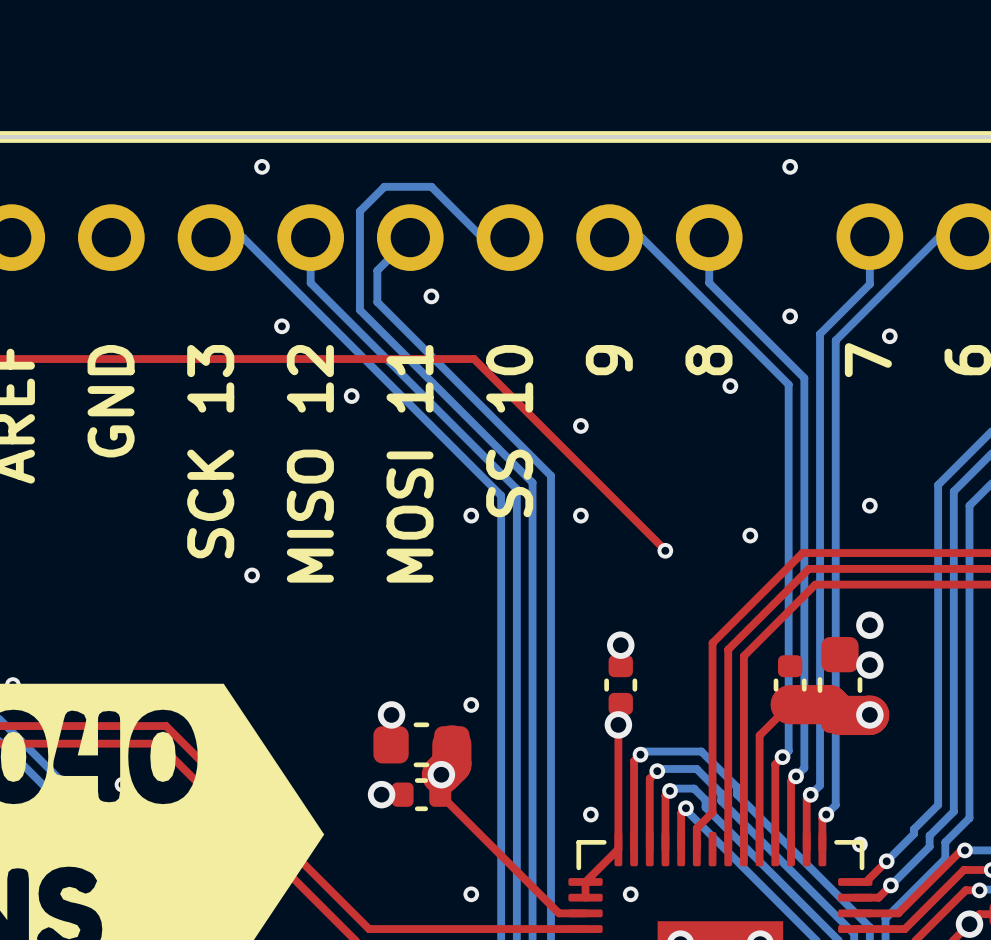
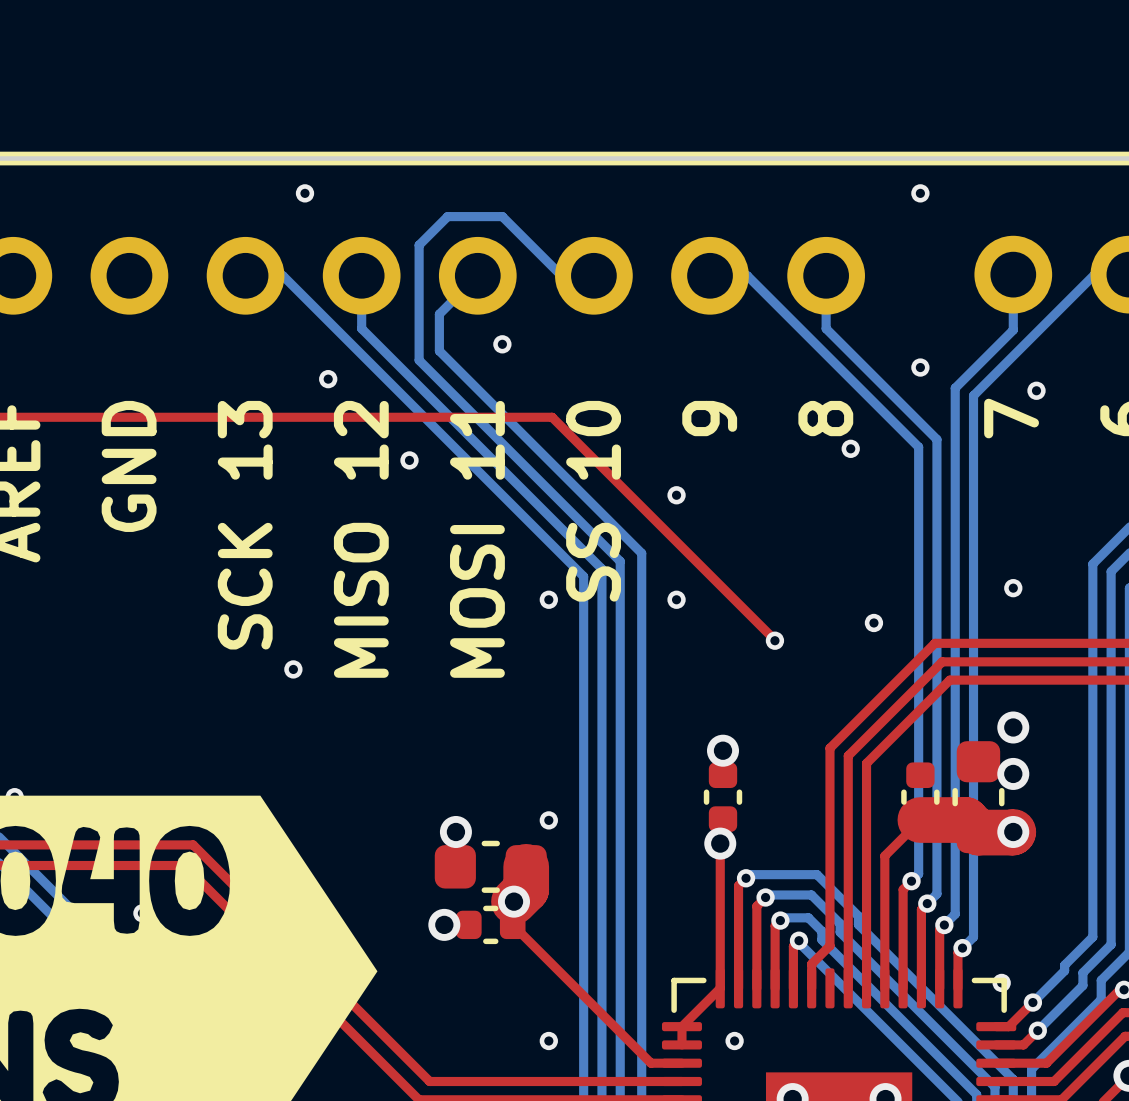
via: (590, 814) -> none

